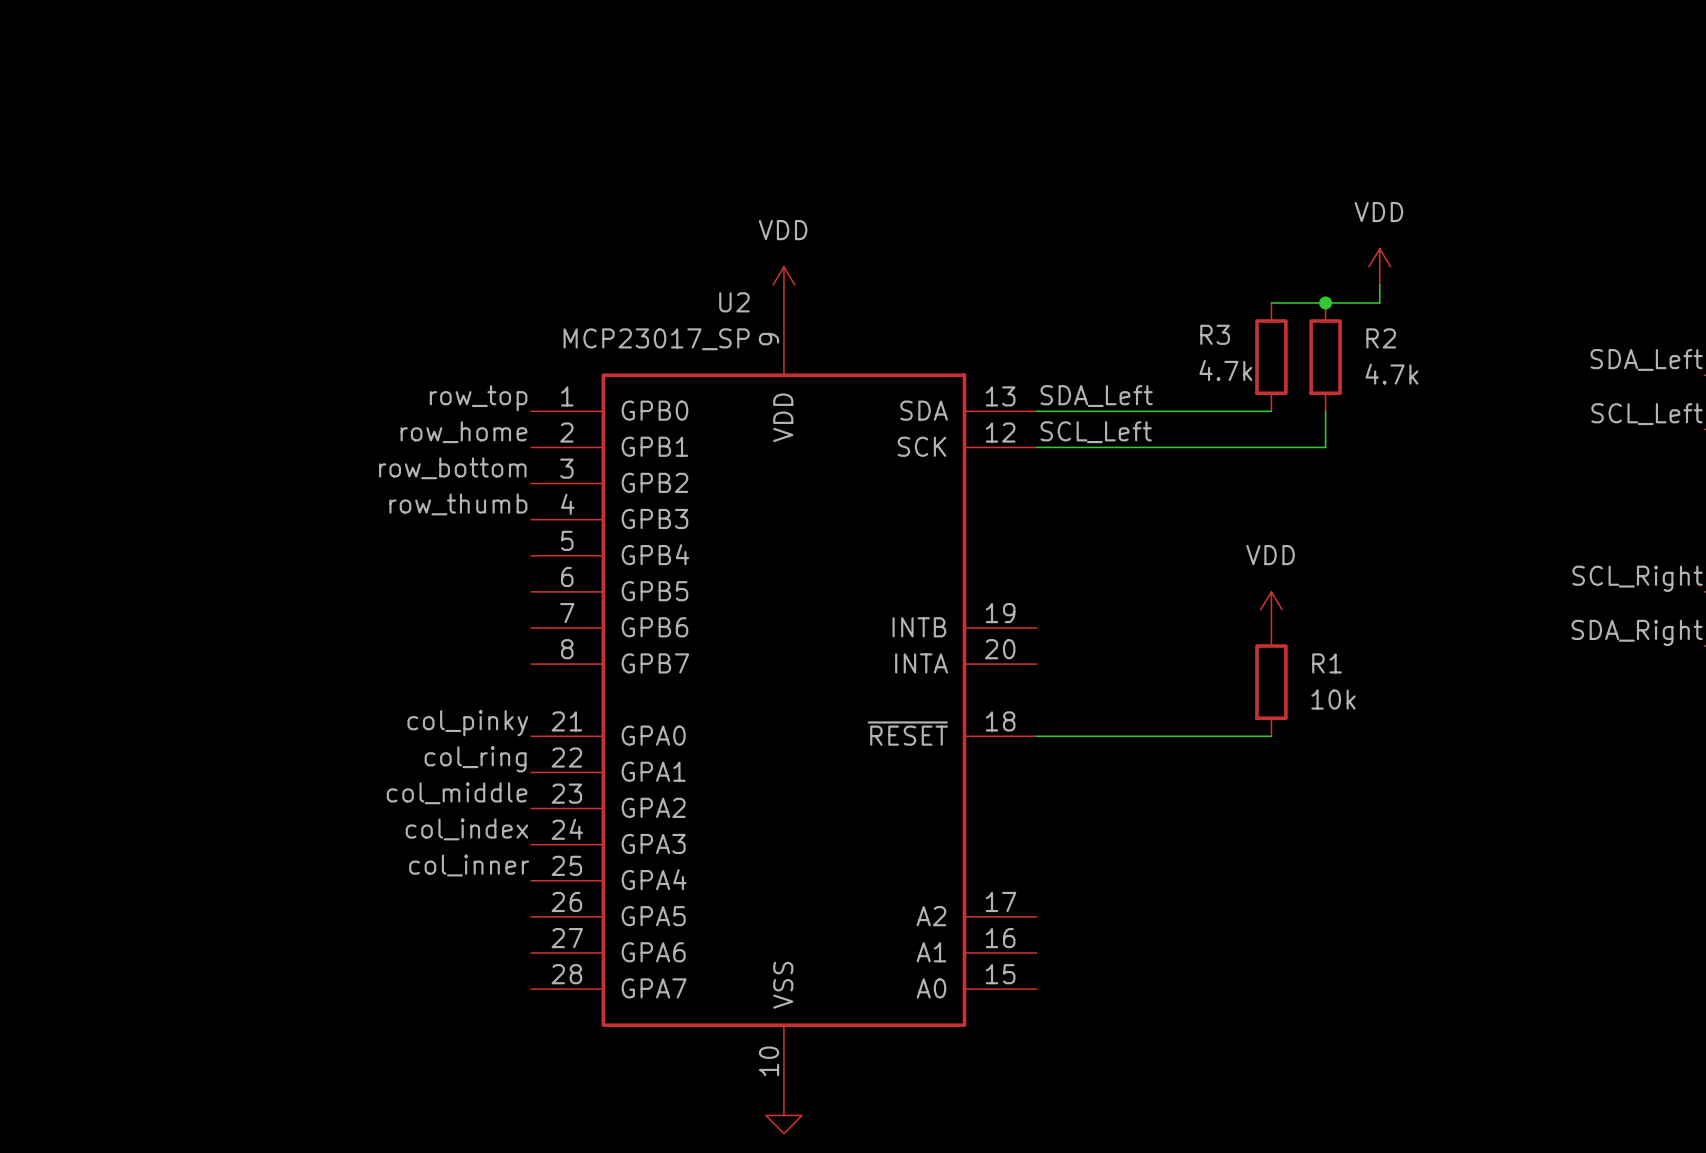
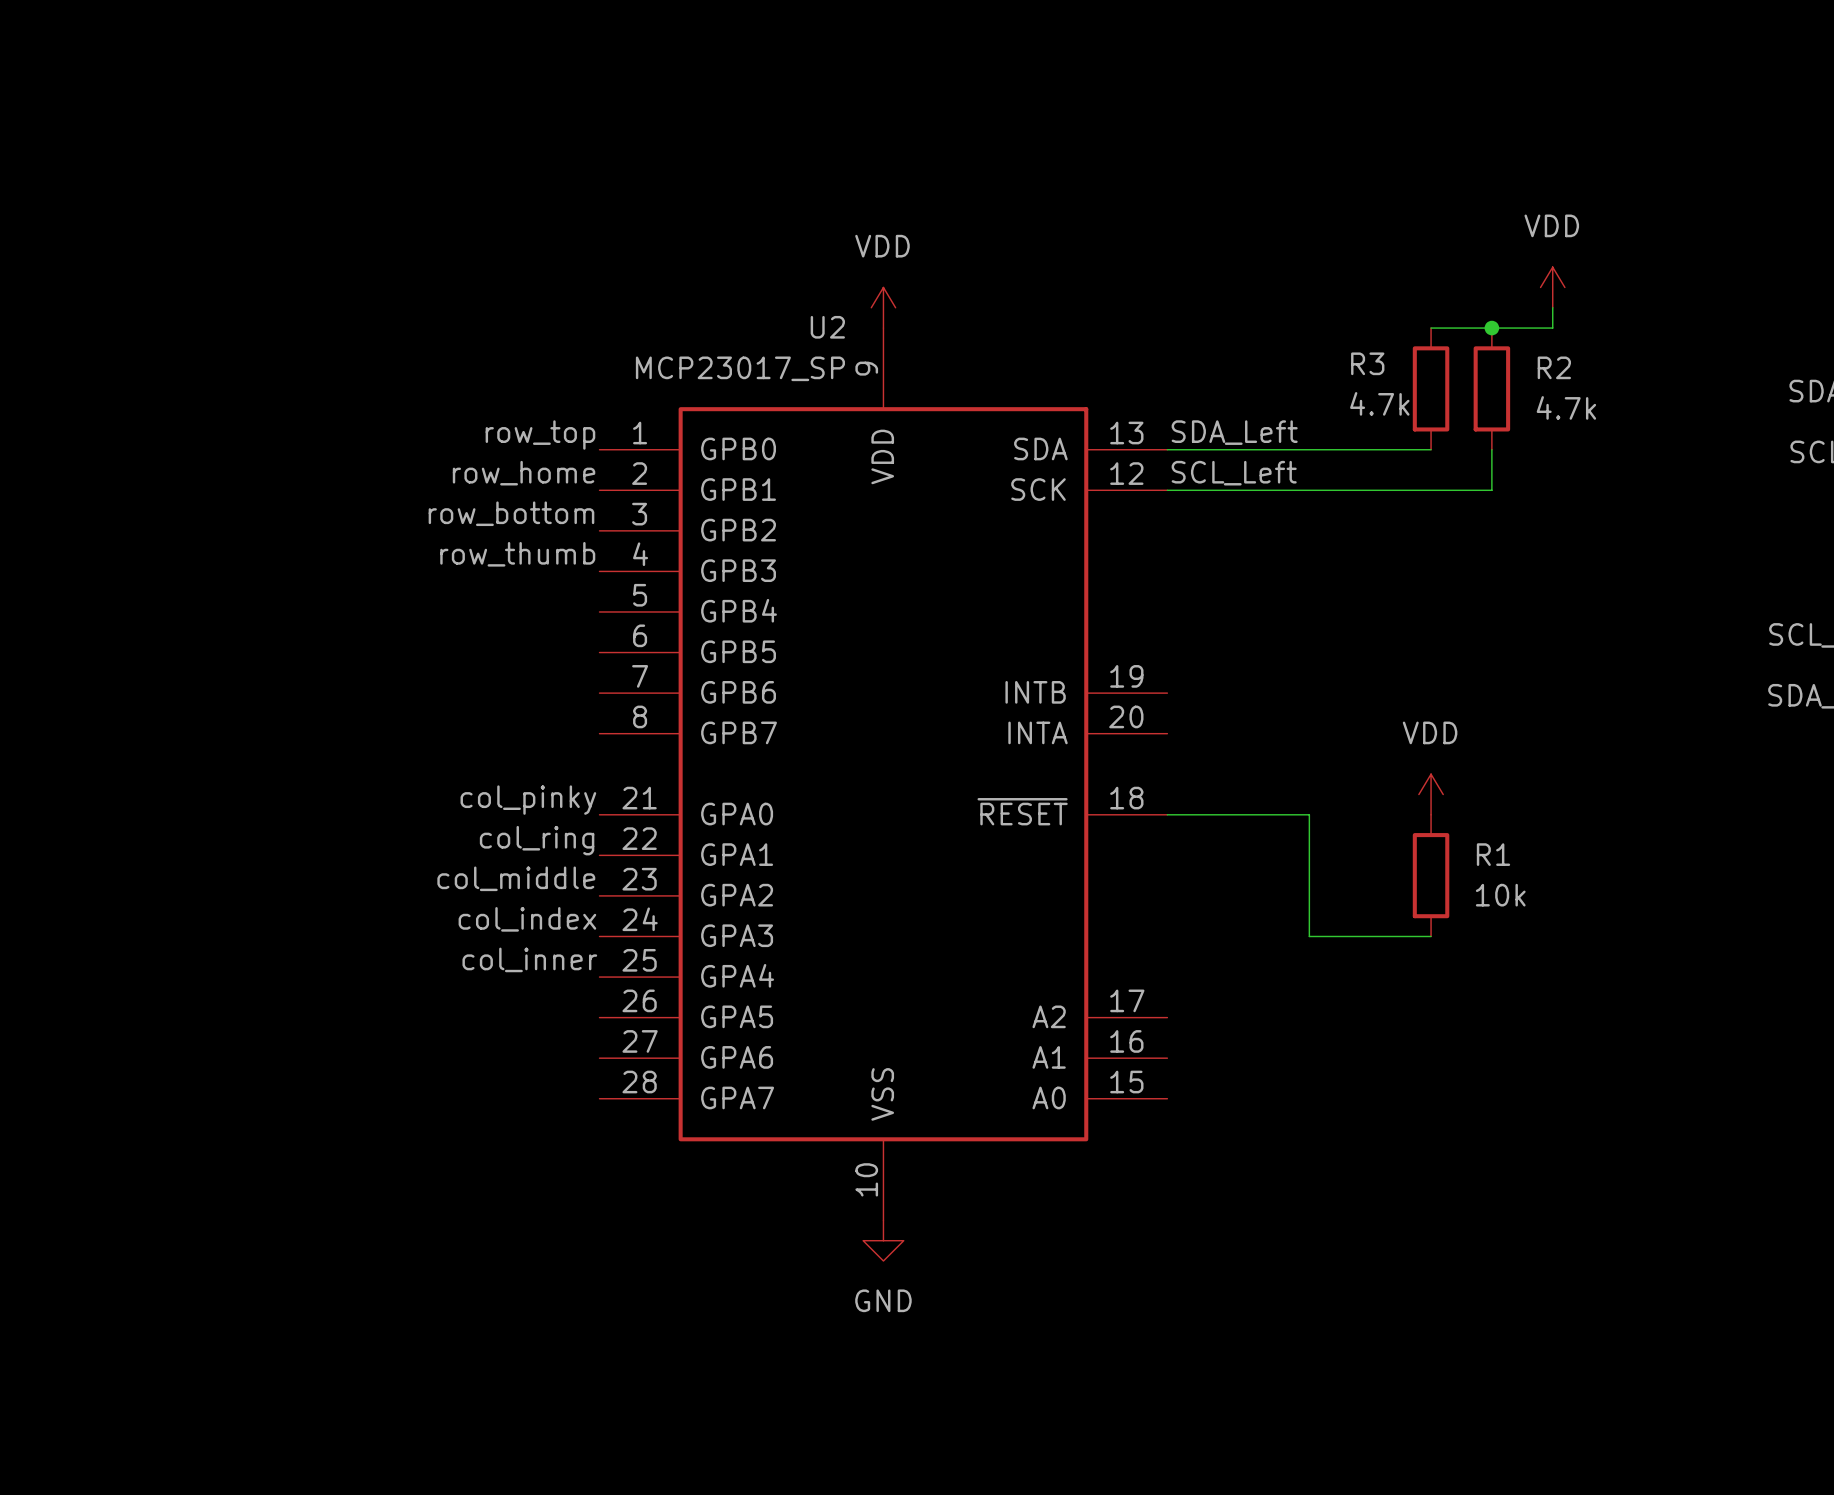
power symbol position: VDD (1271, 609) -> VDD (1431, 794)
R1 position: (1271, 682) -> (1431, 875)
wire: (1163, 736) (1271, 736) -> (1309, 814) (1309, 936) (1431, 936)

